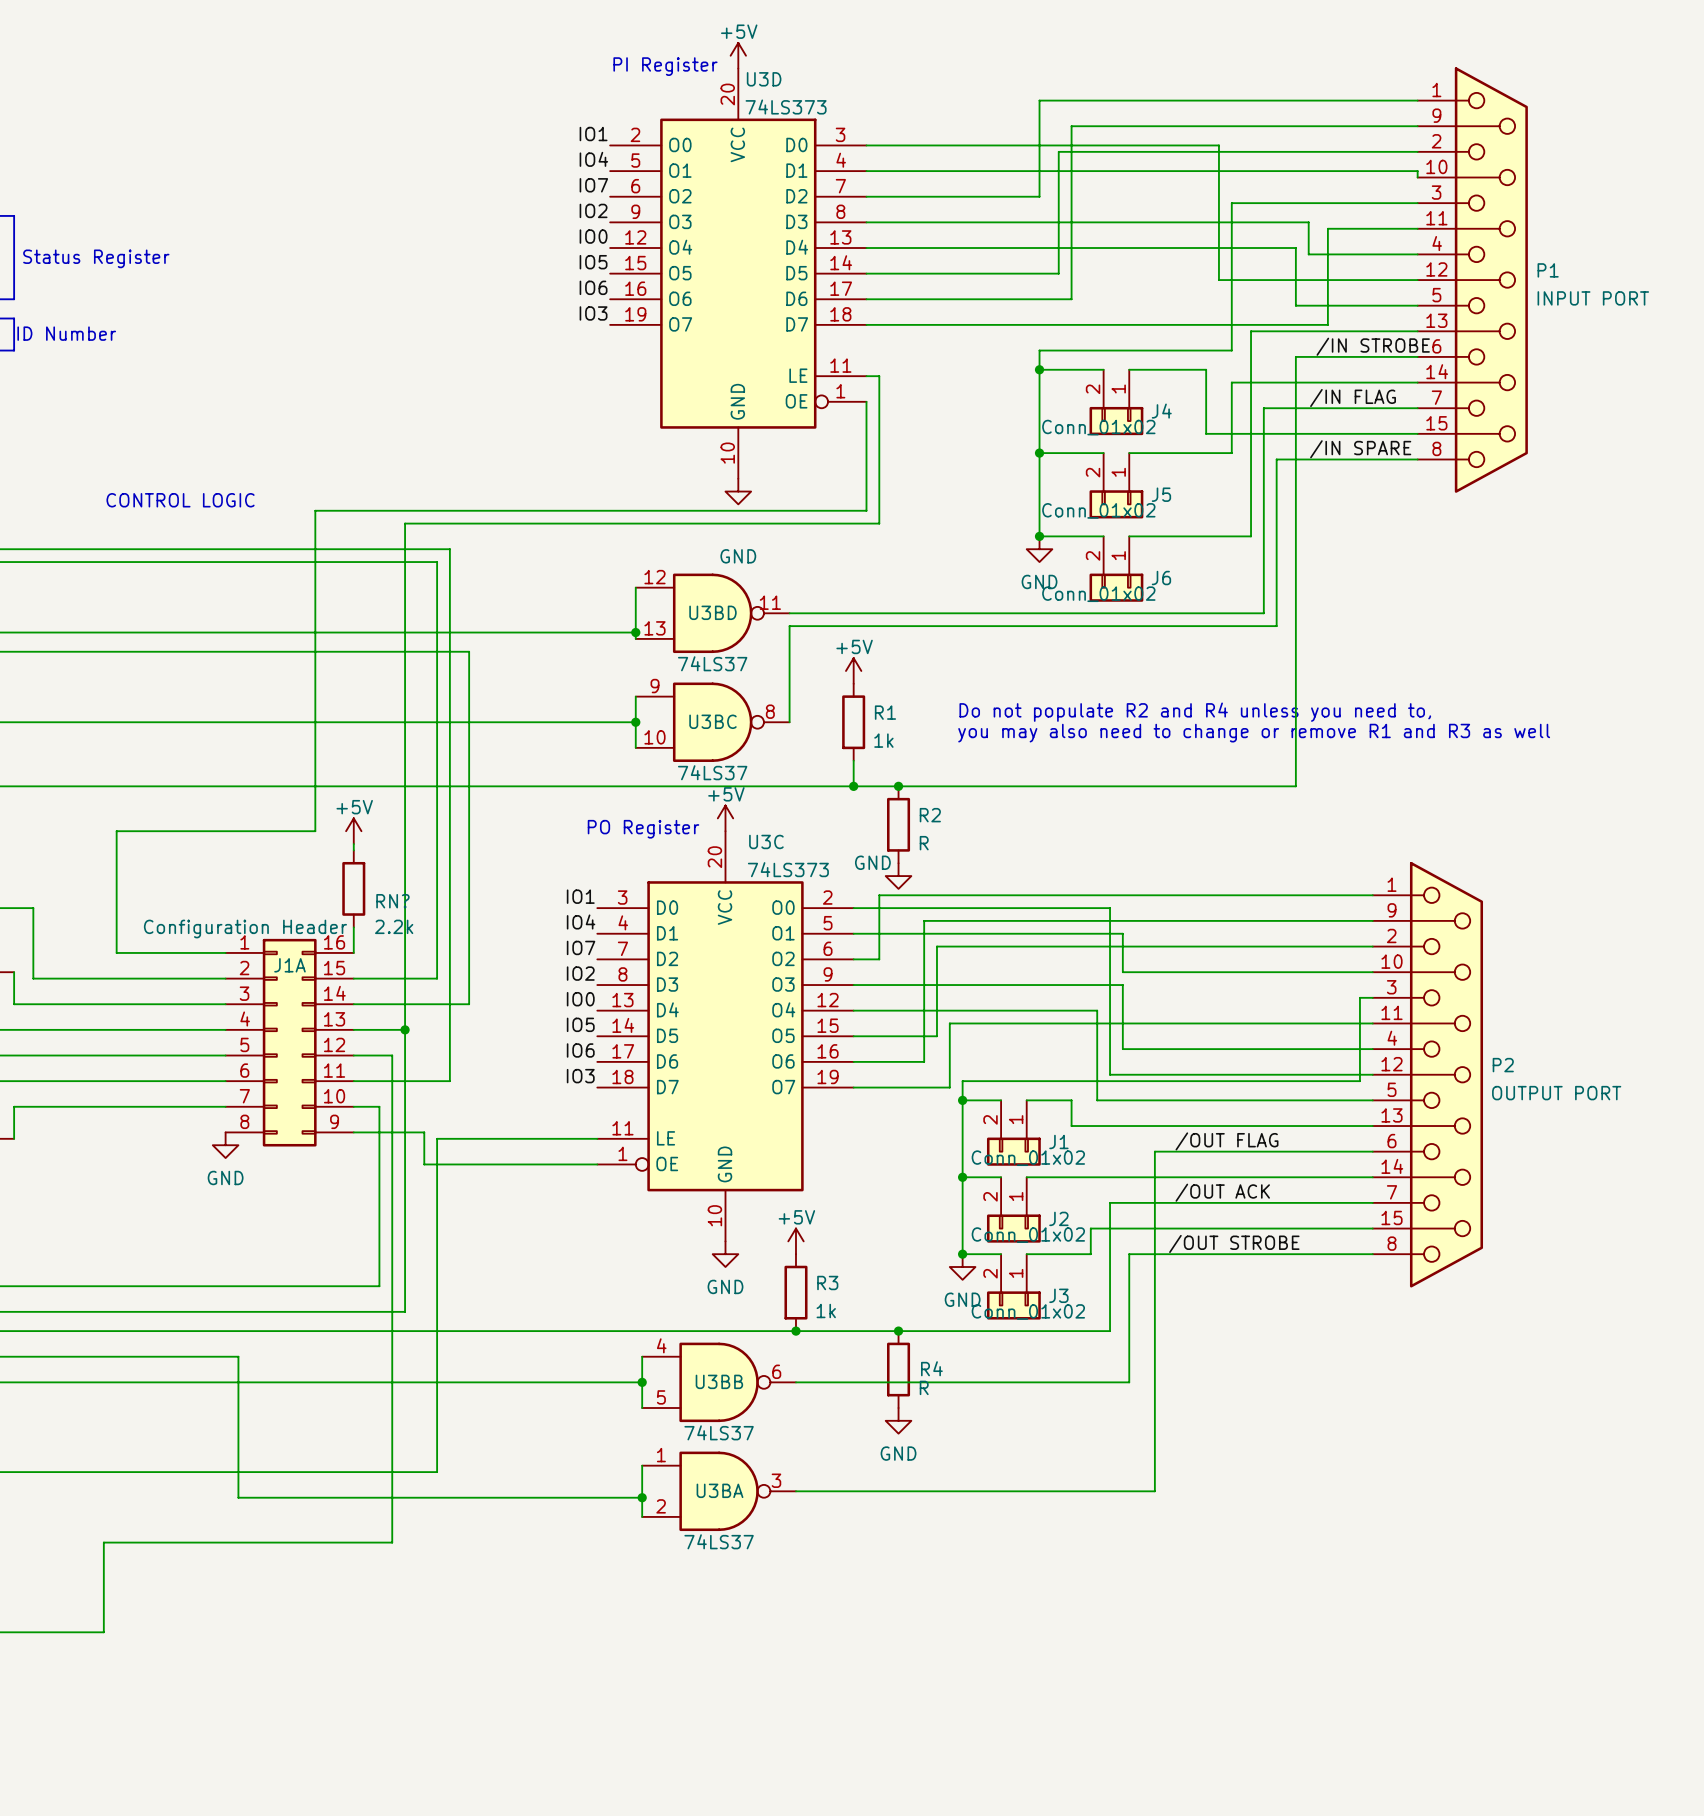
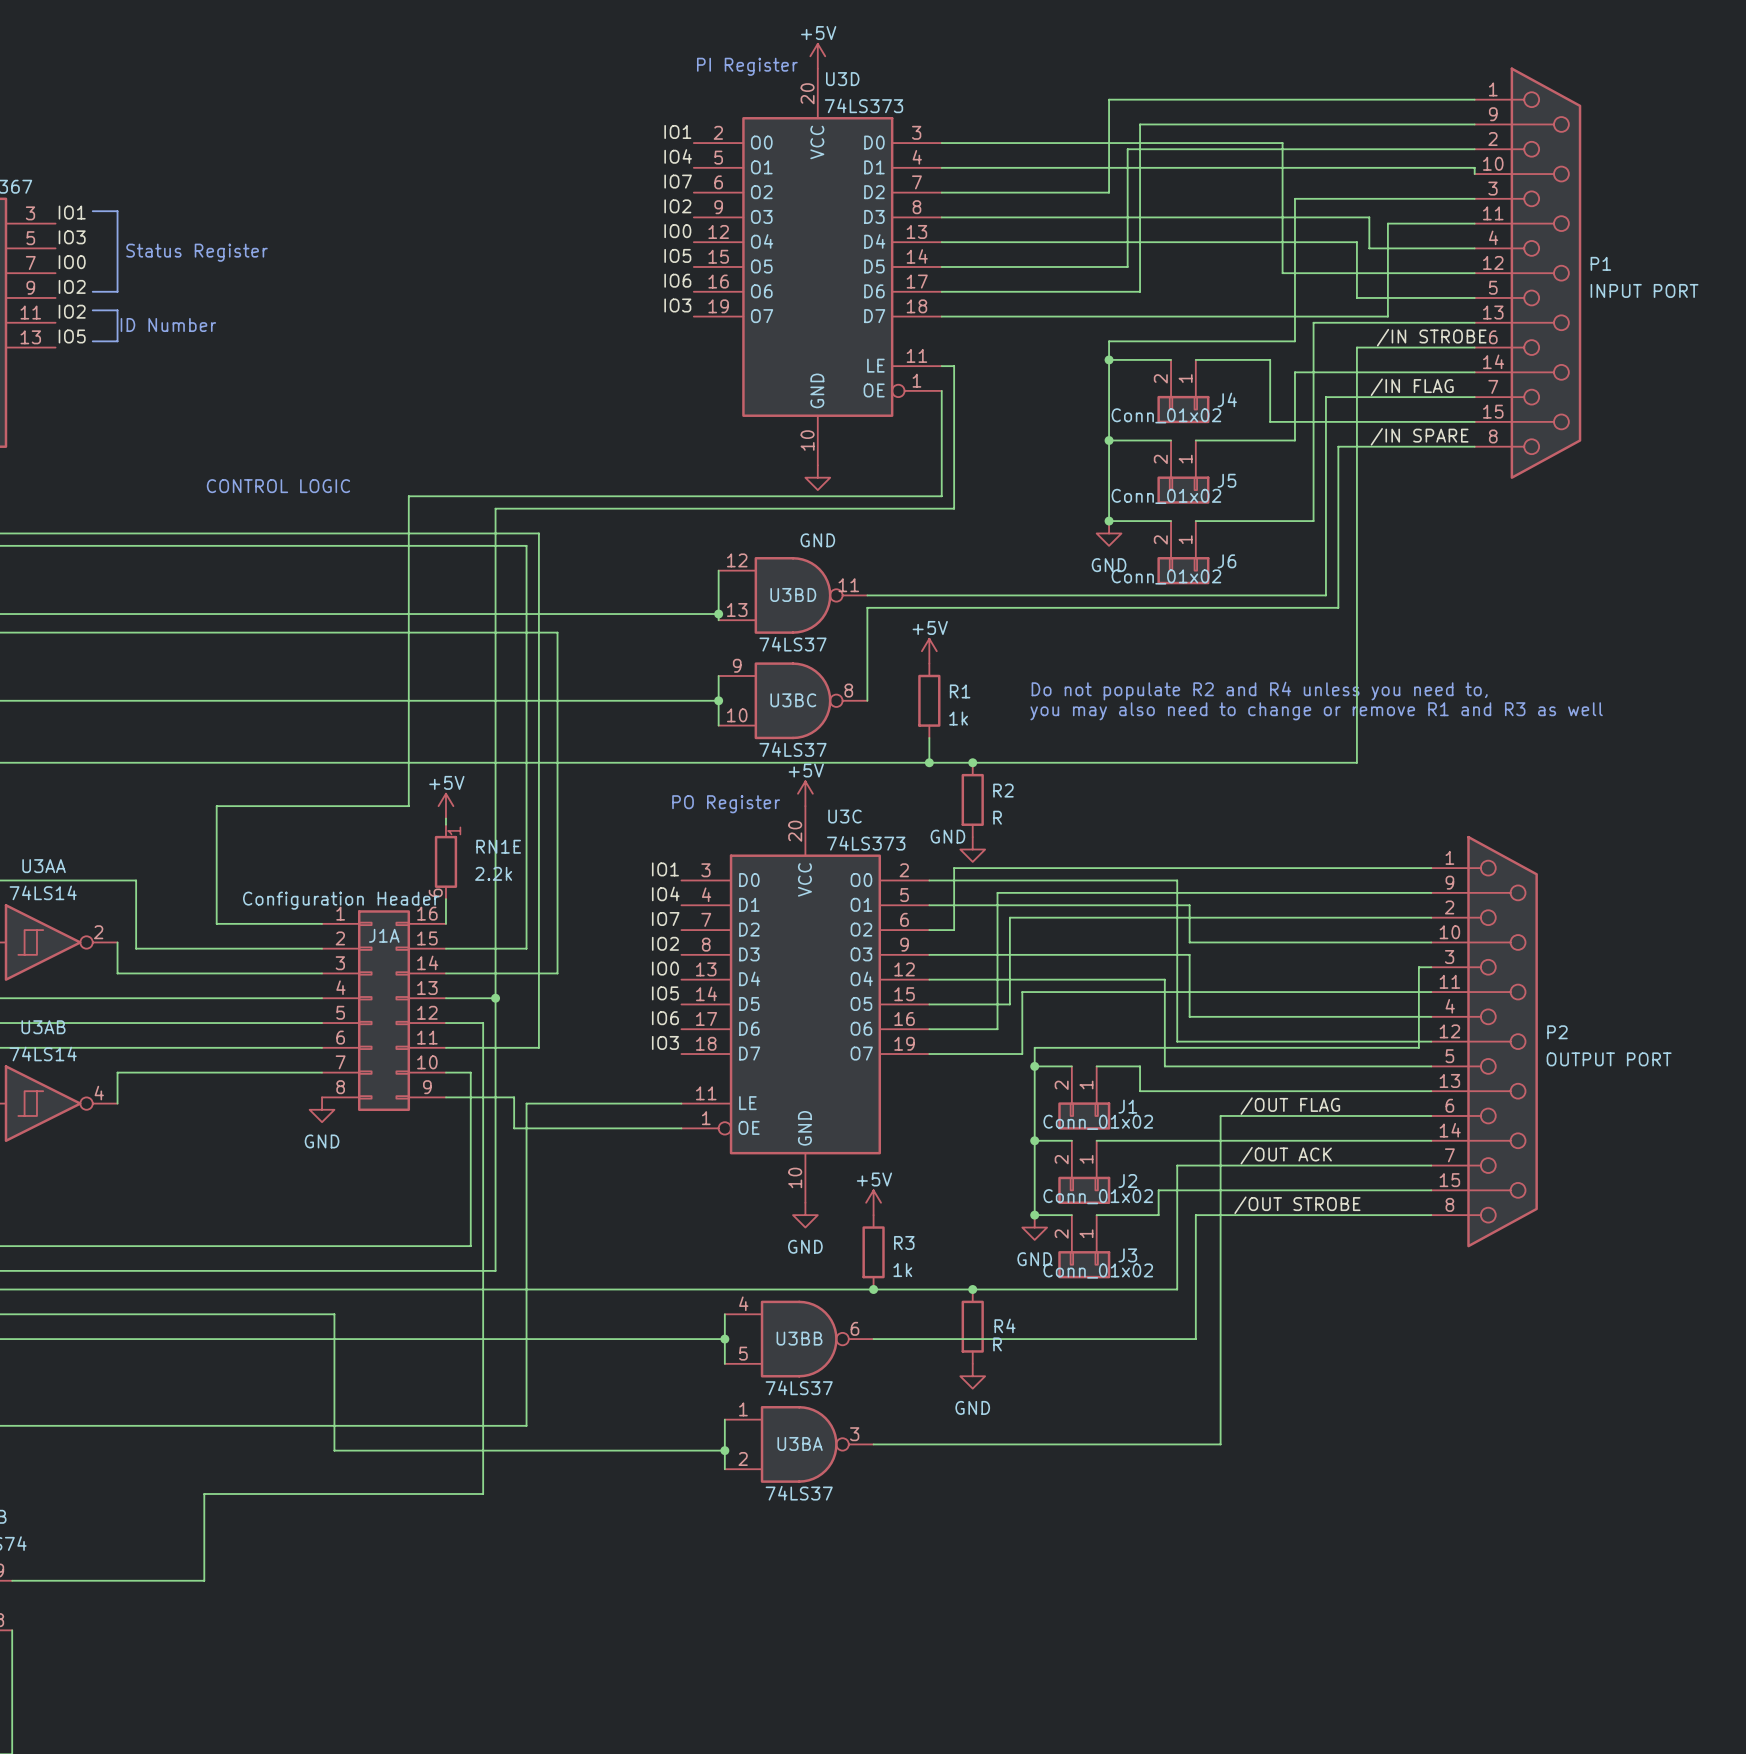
RN?: 2.2k (353, 888) -> none
RN1E: none -> 2.2k (445, 861)

